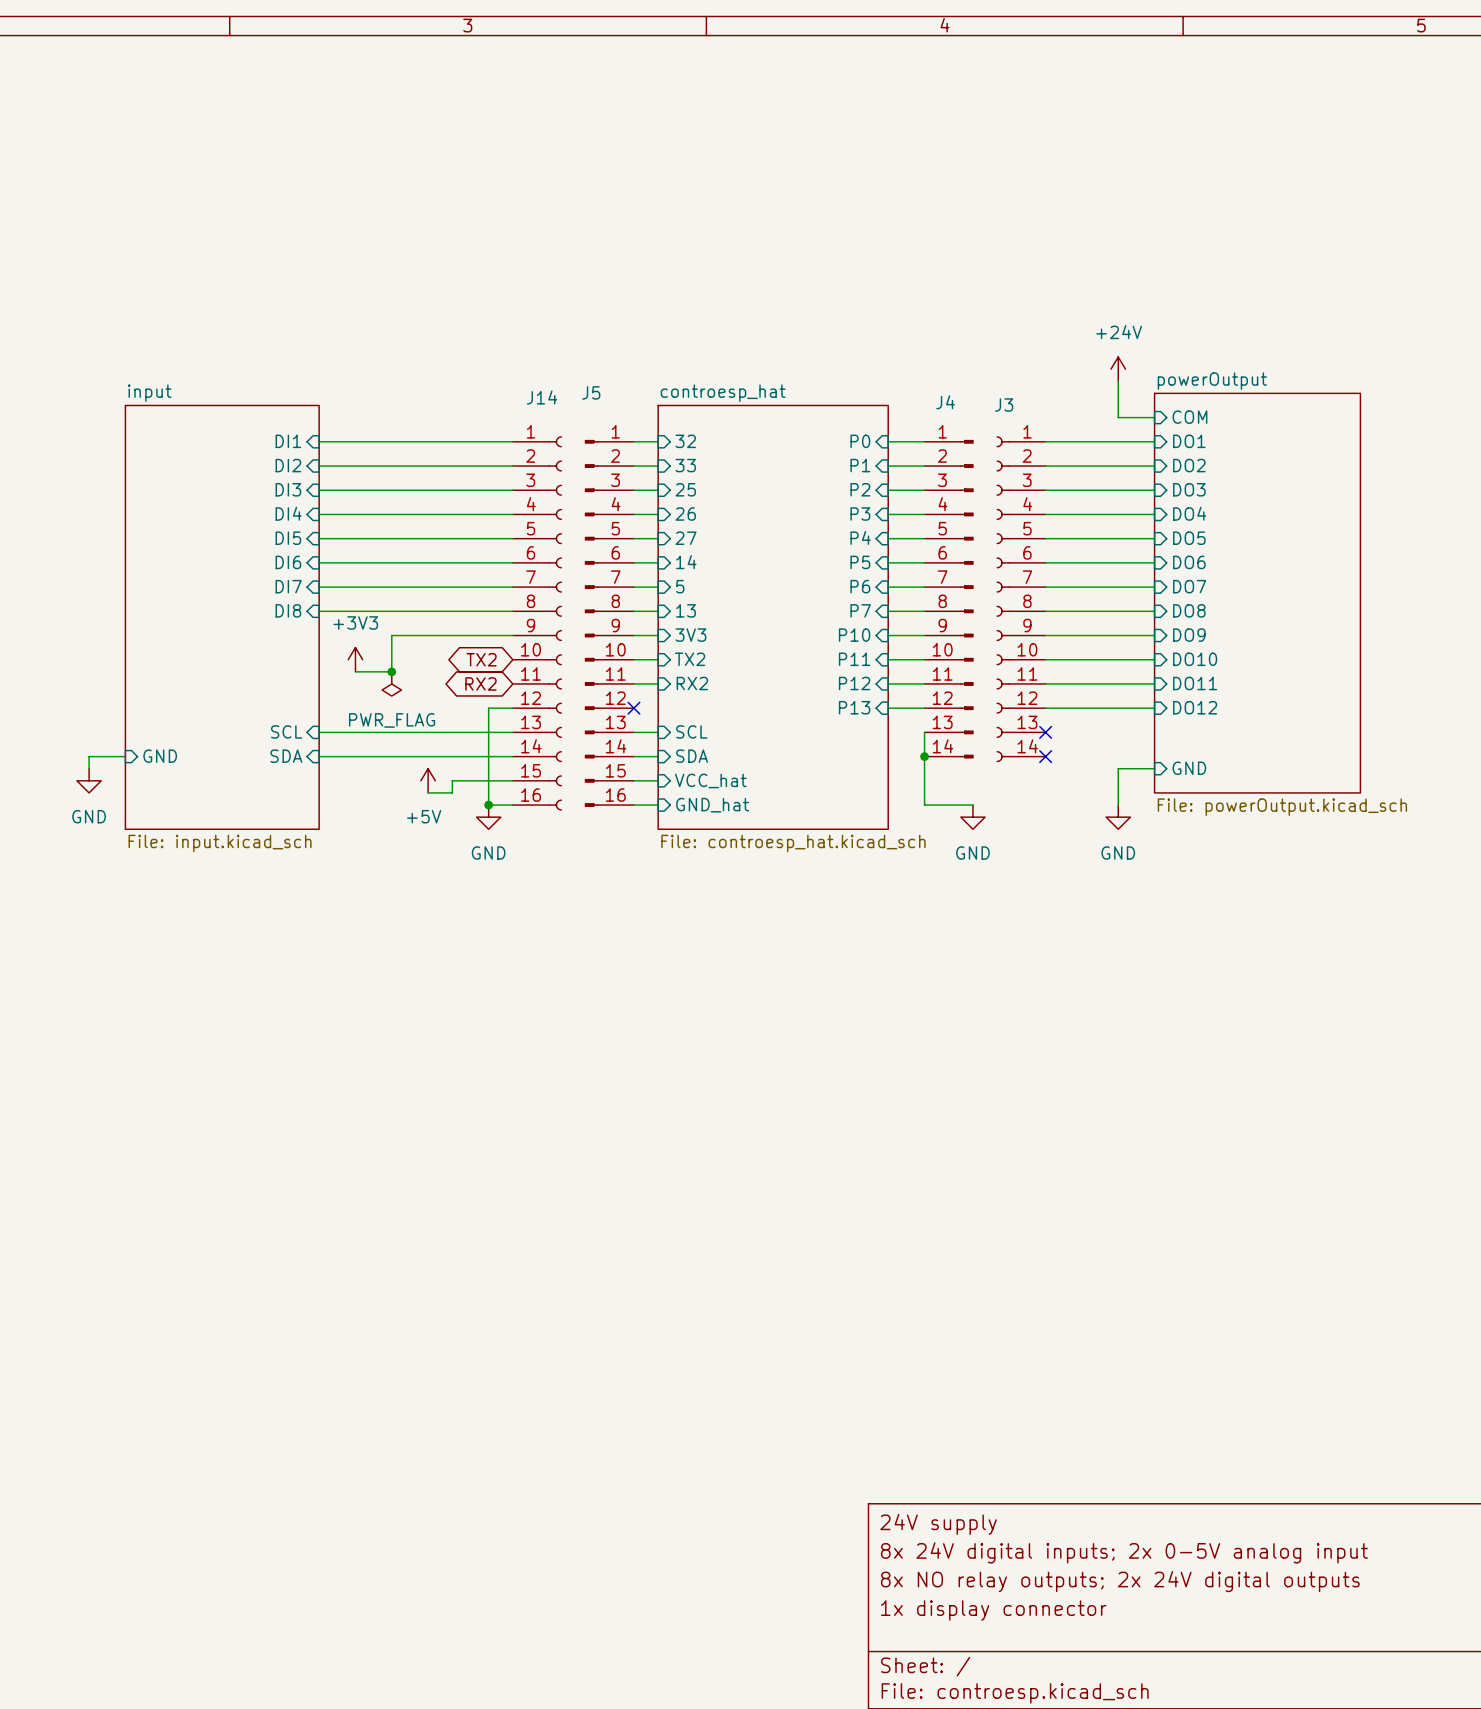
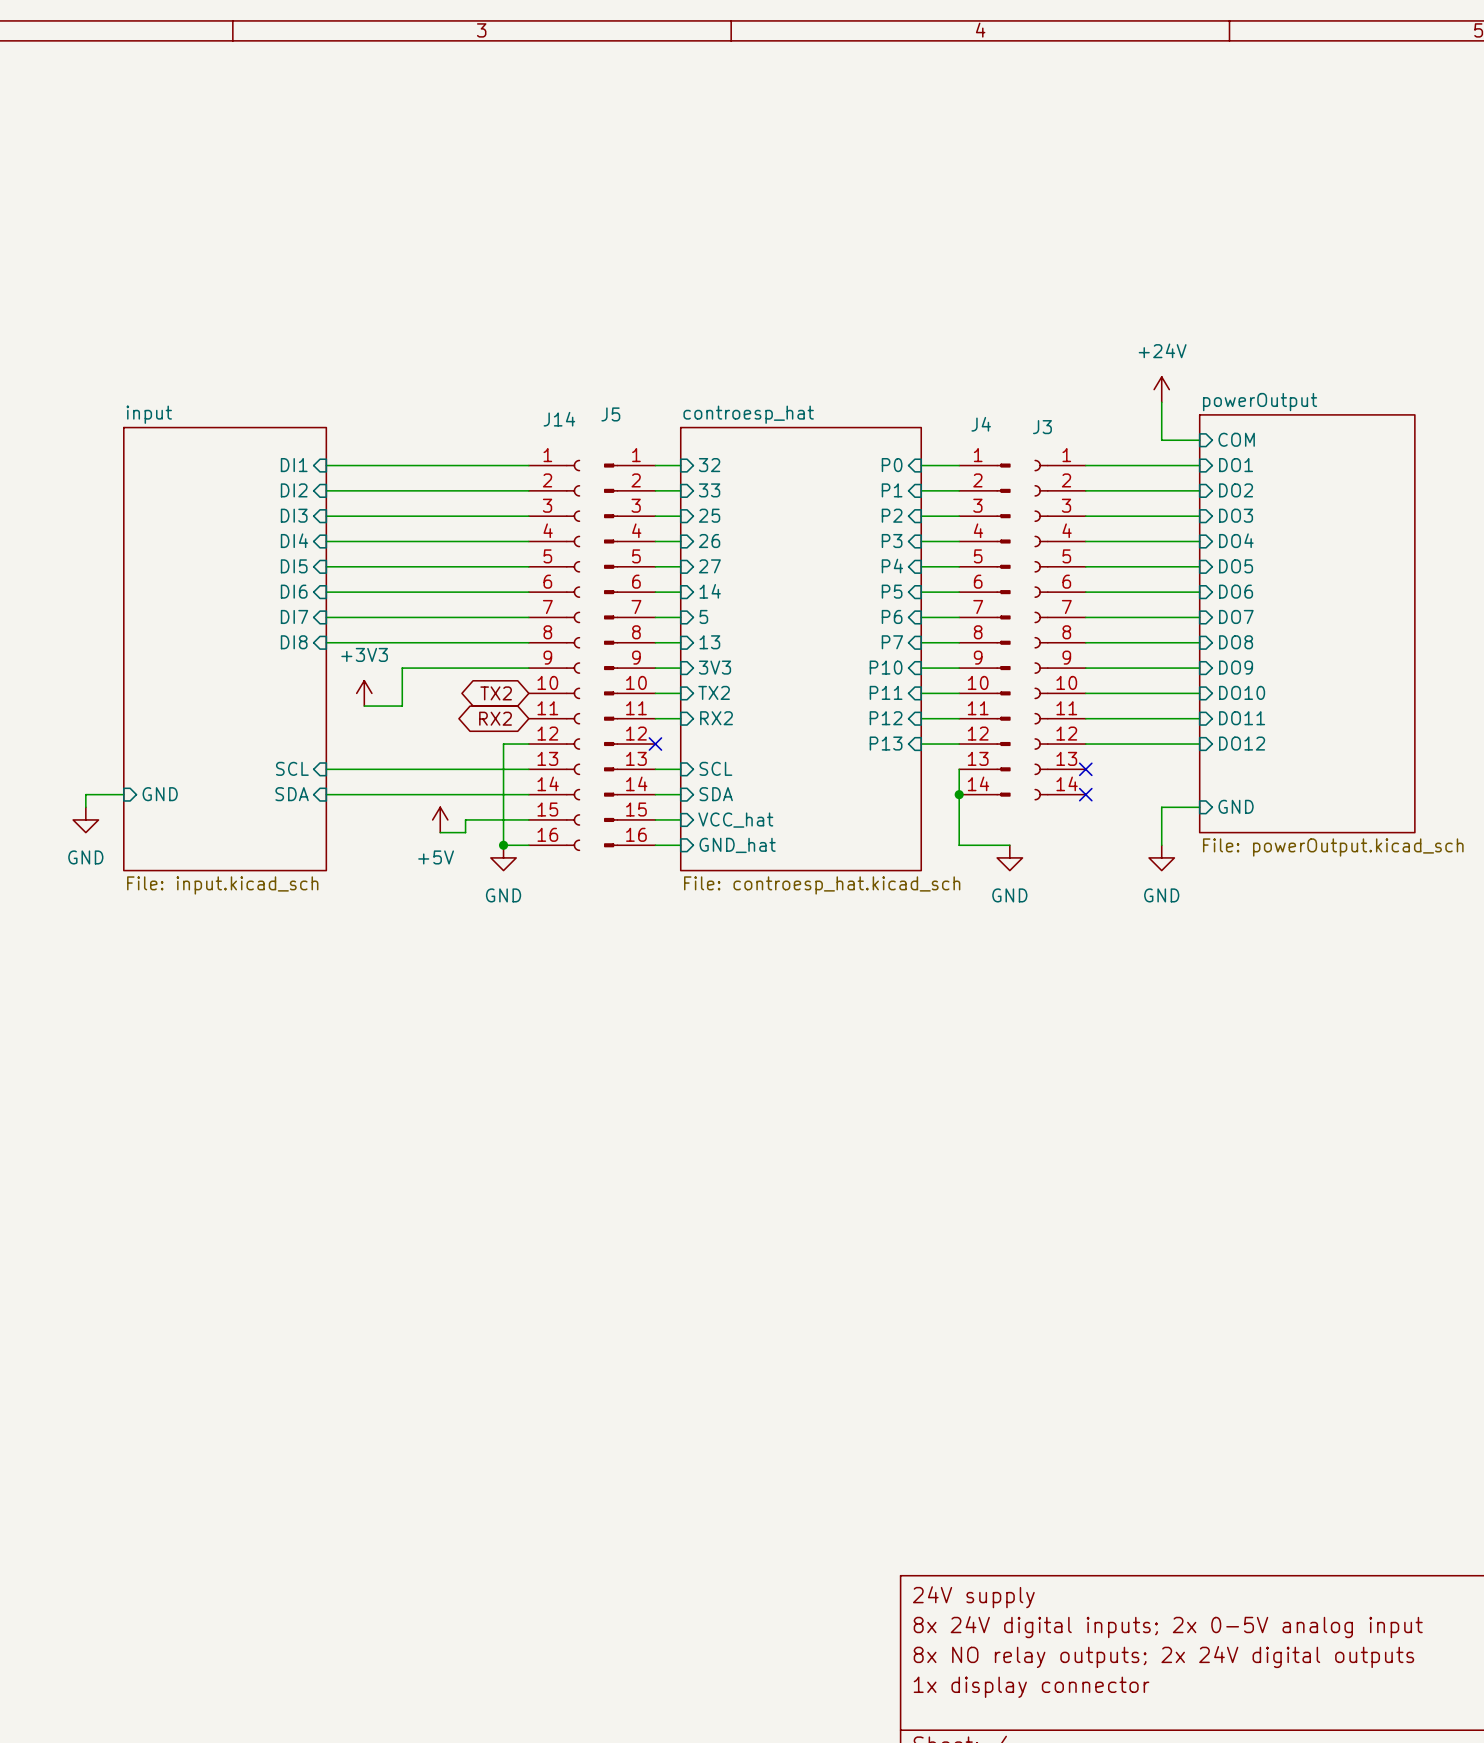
junction: (391, 671) -> none
power symbol: PWR_FLAG (391, 683) -> none

